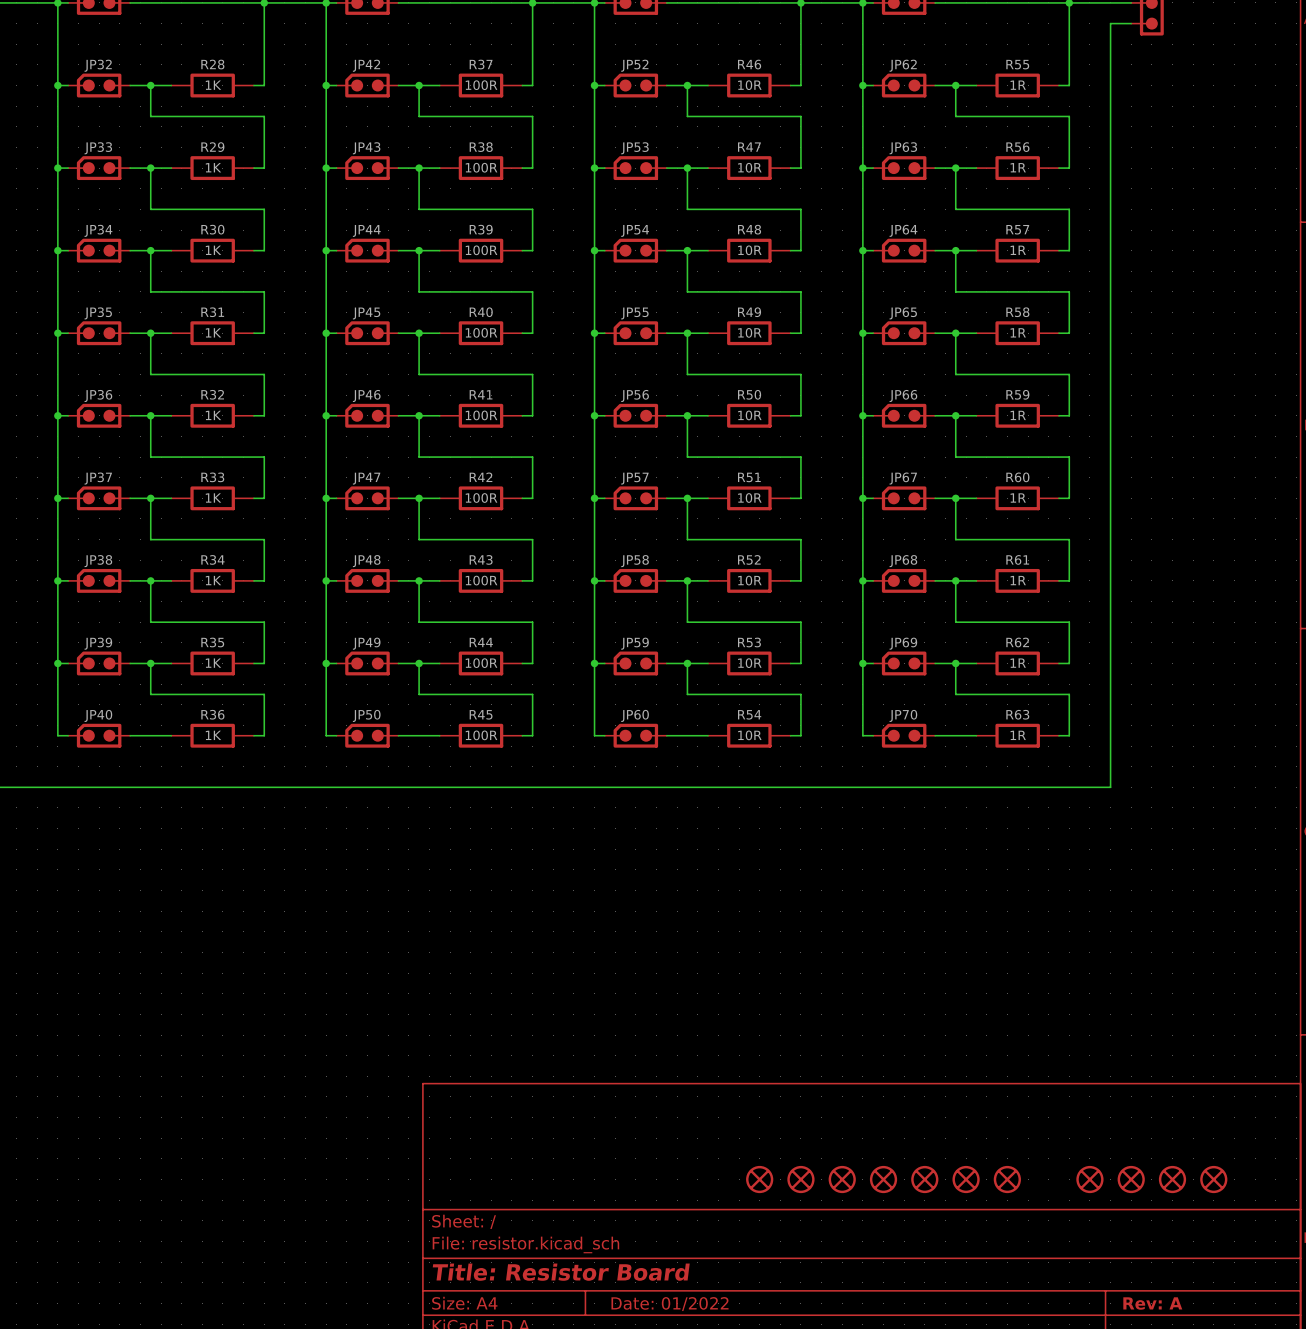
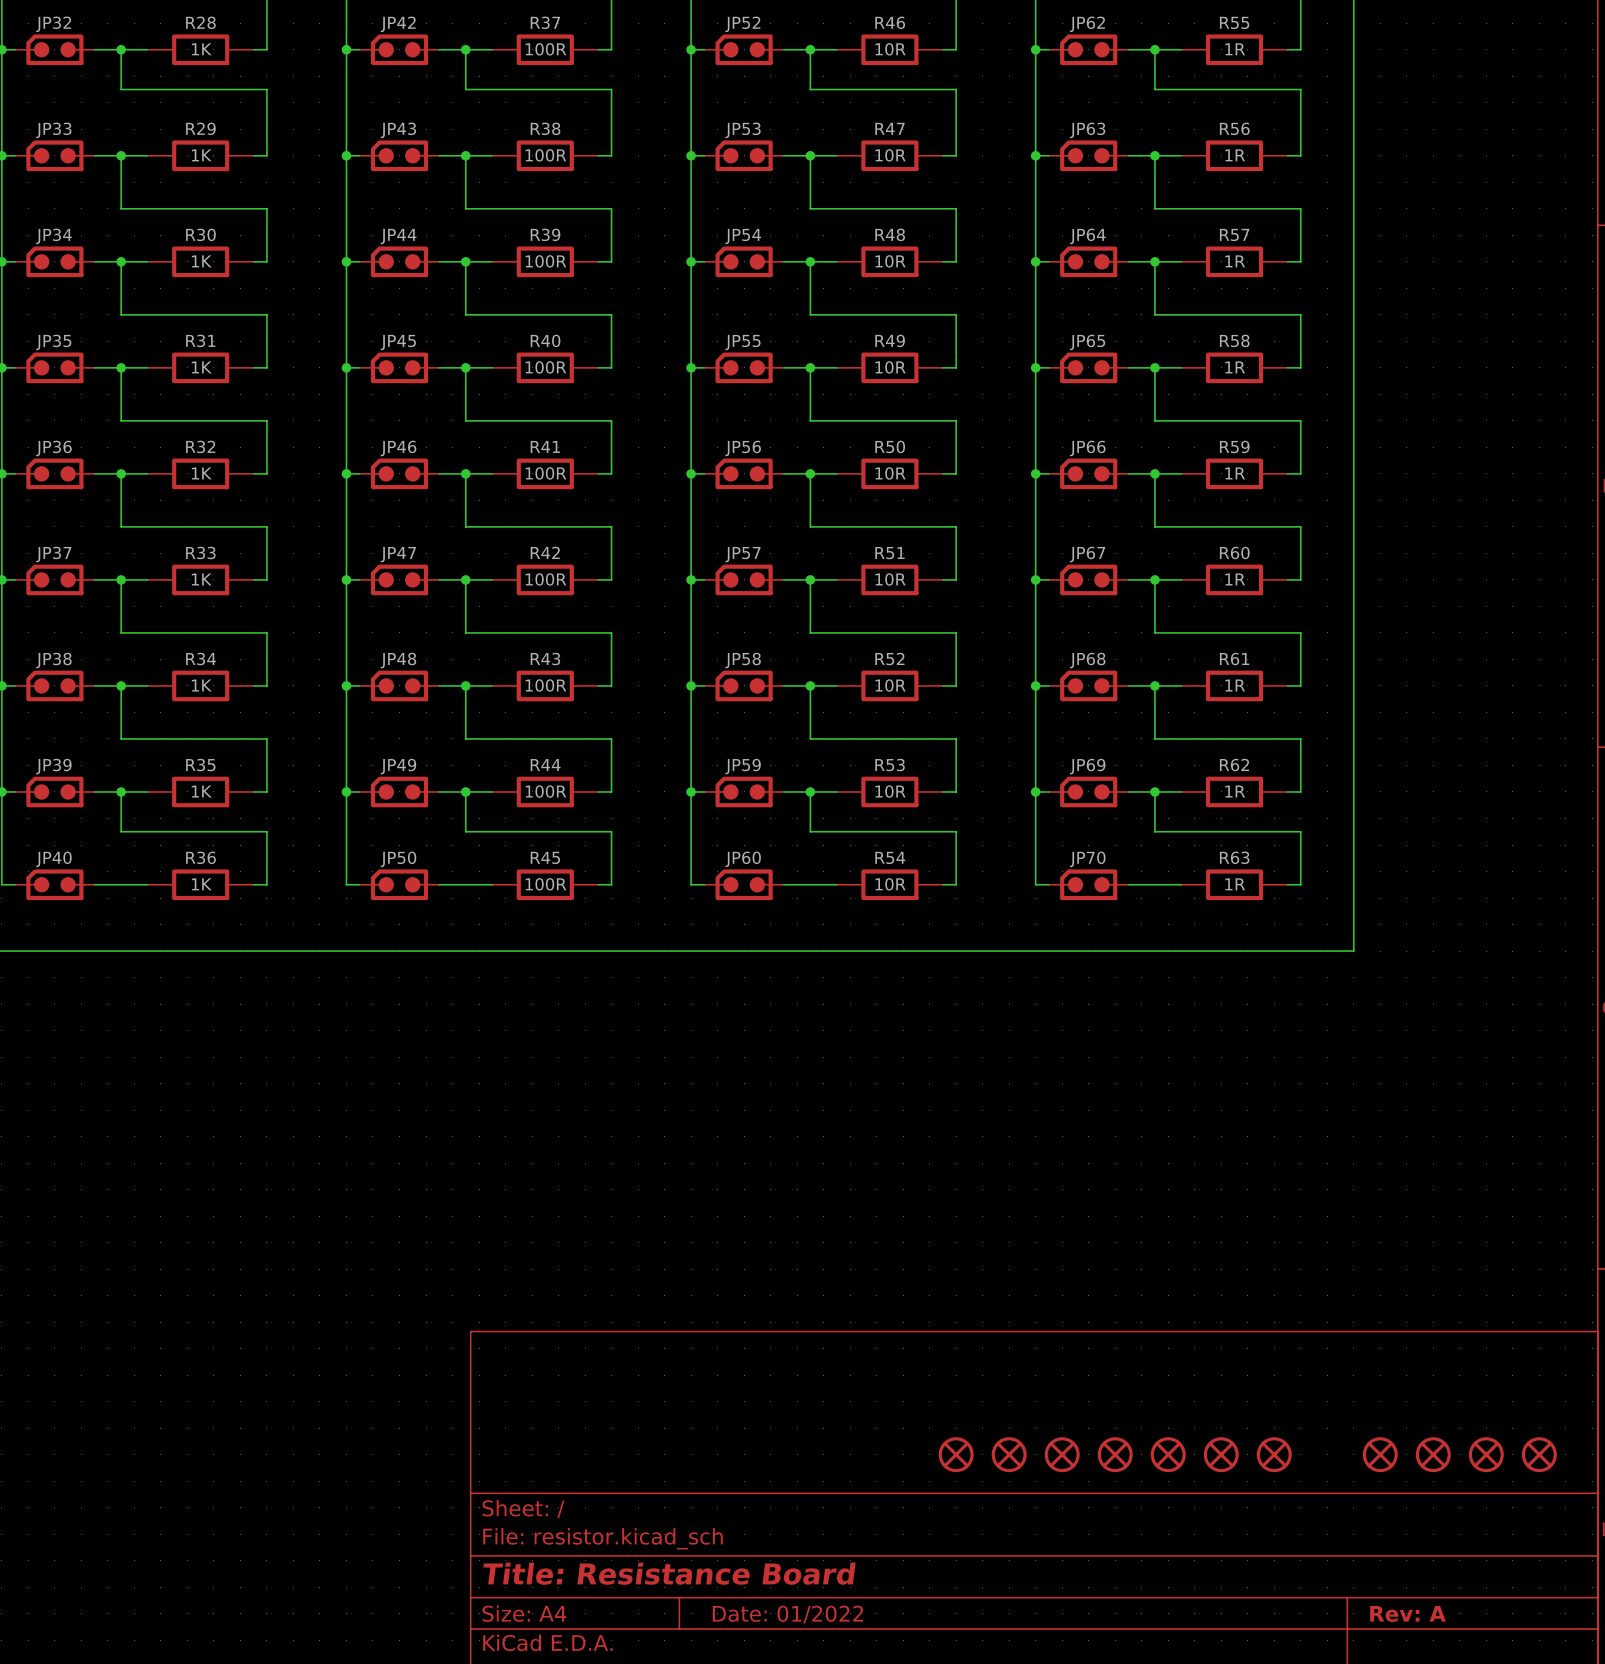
part: (759, 1179) -> none
part position: (1089, 1179) -> (1274, 1454)
part: none -> (1539, 1454)
title block: Title: Resistor Board (561, 1272) -> Title: Resistance Board (669, 1573)

